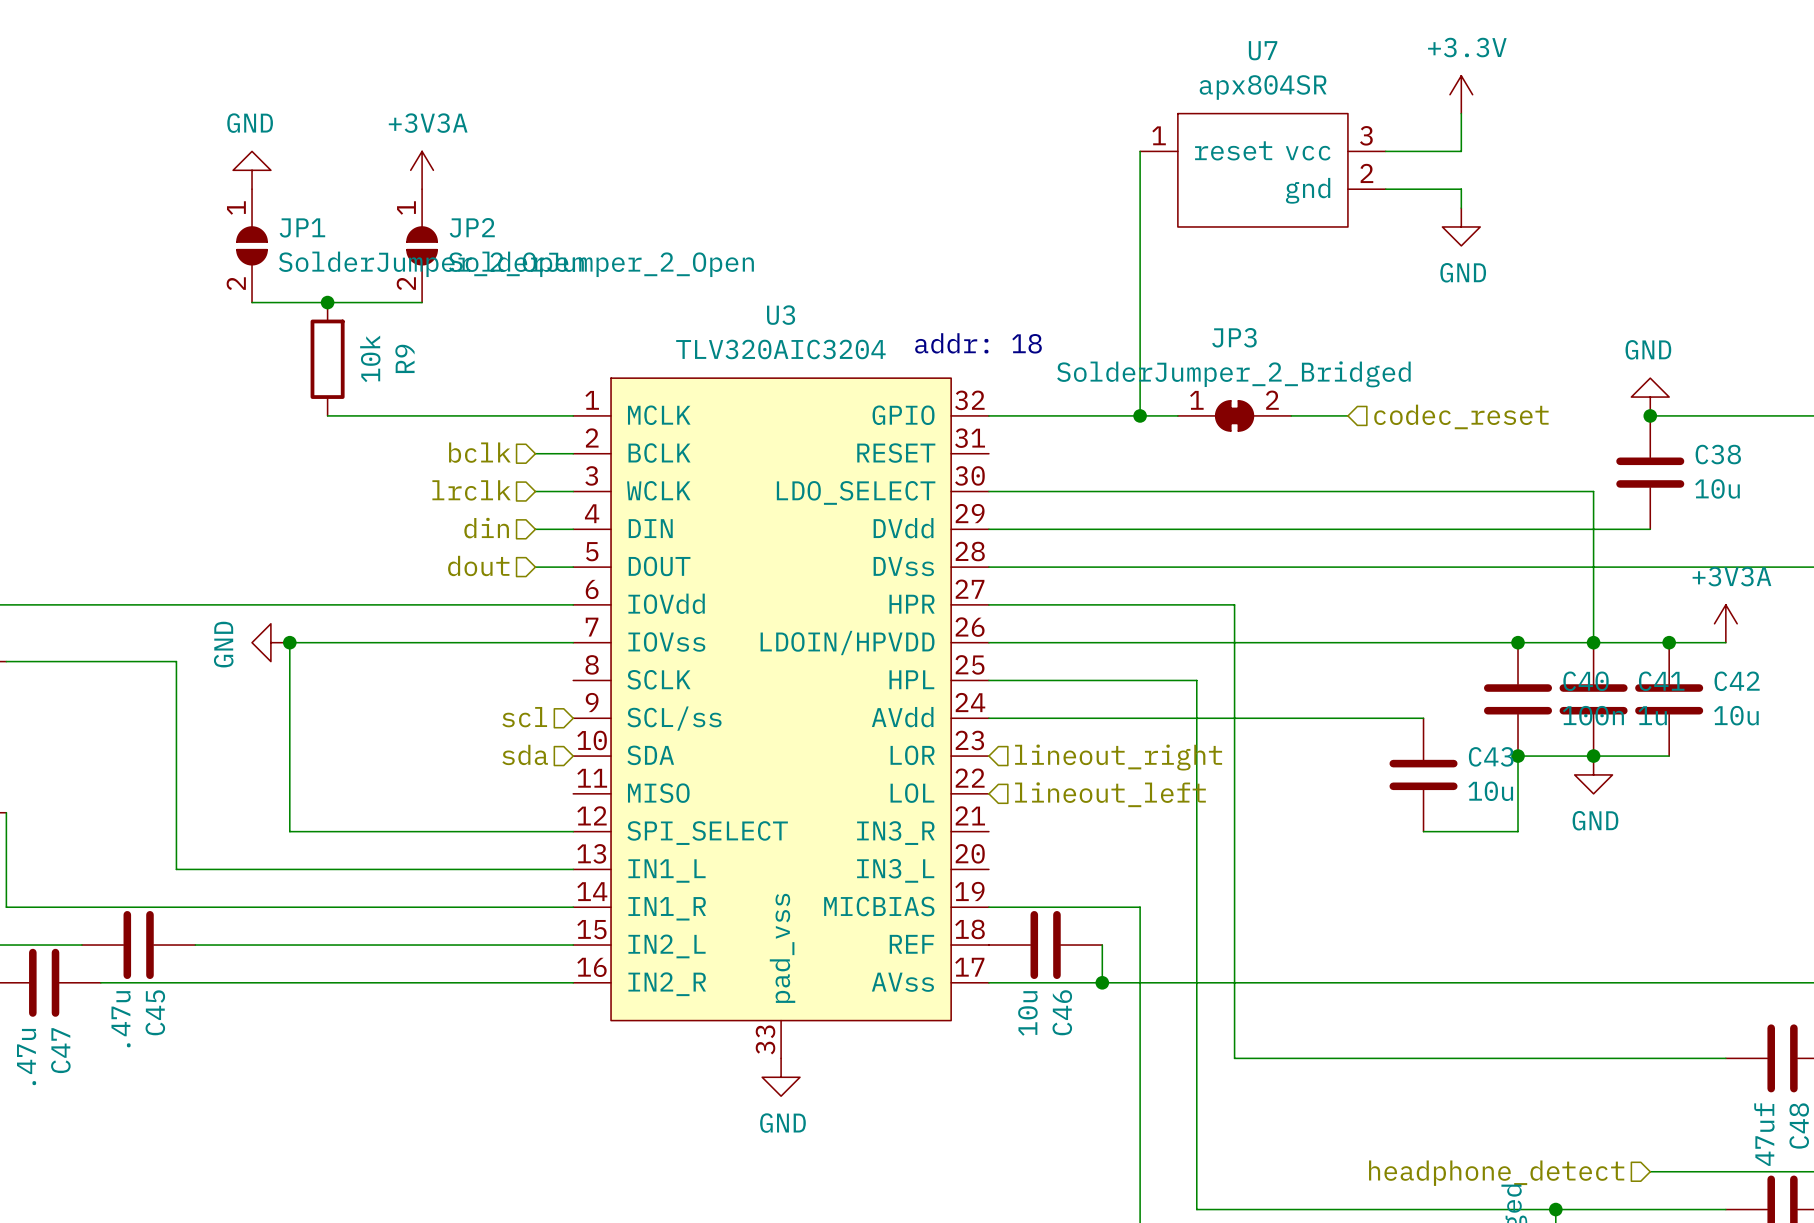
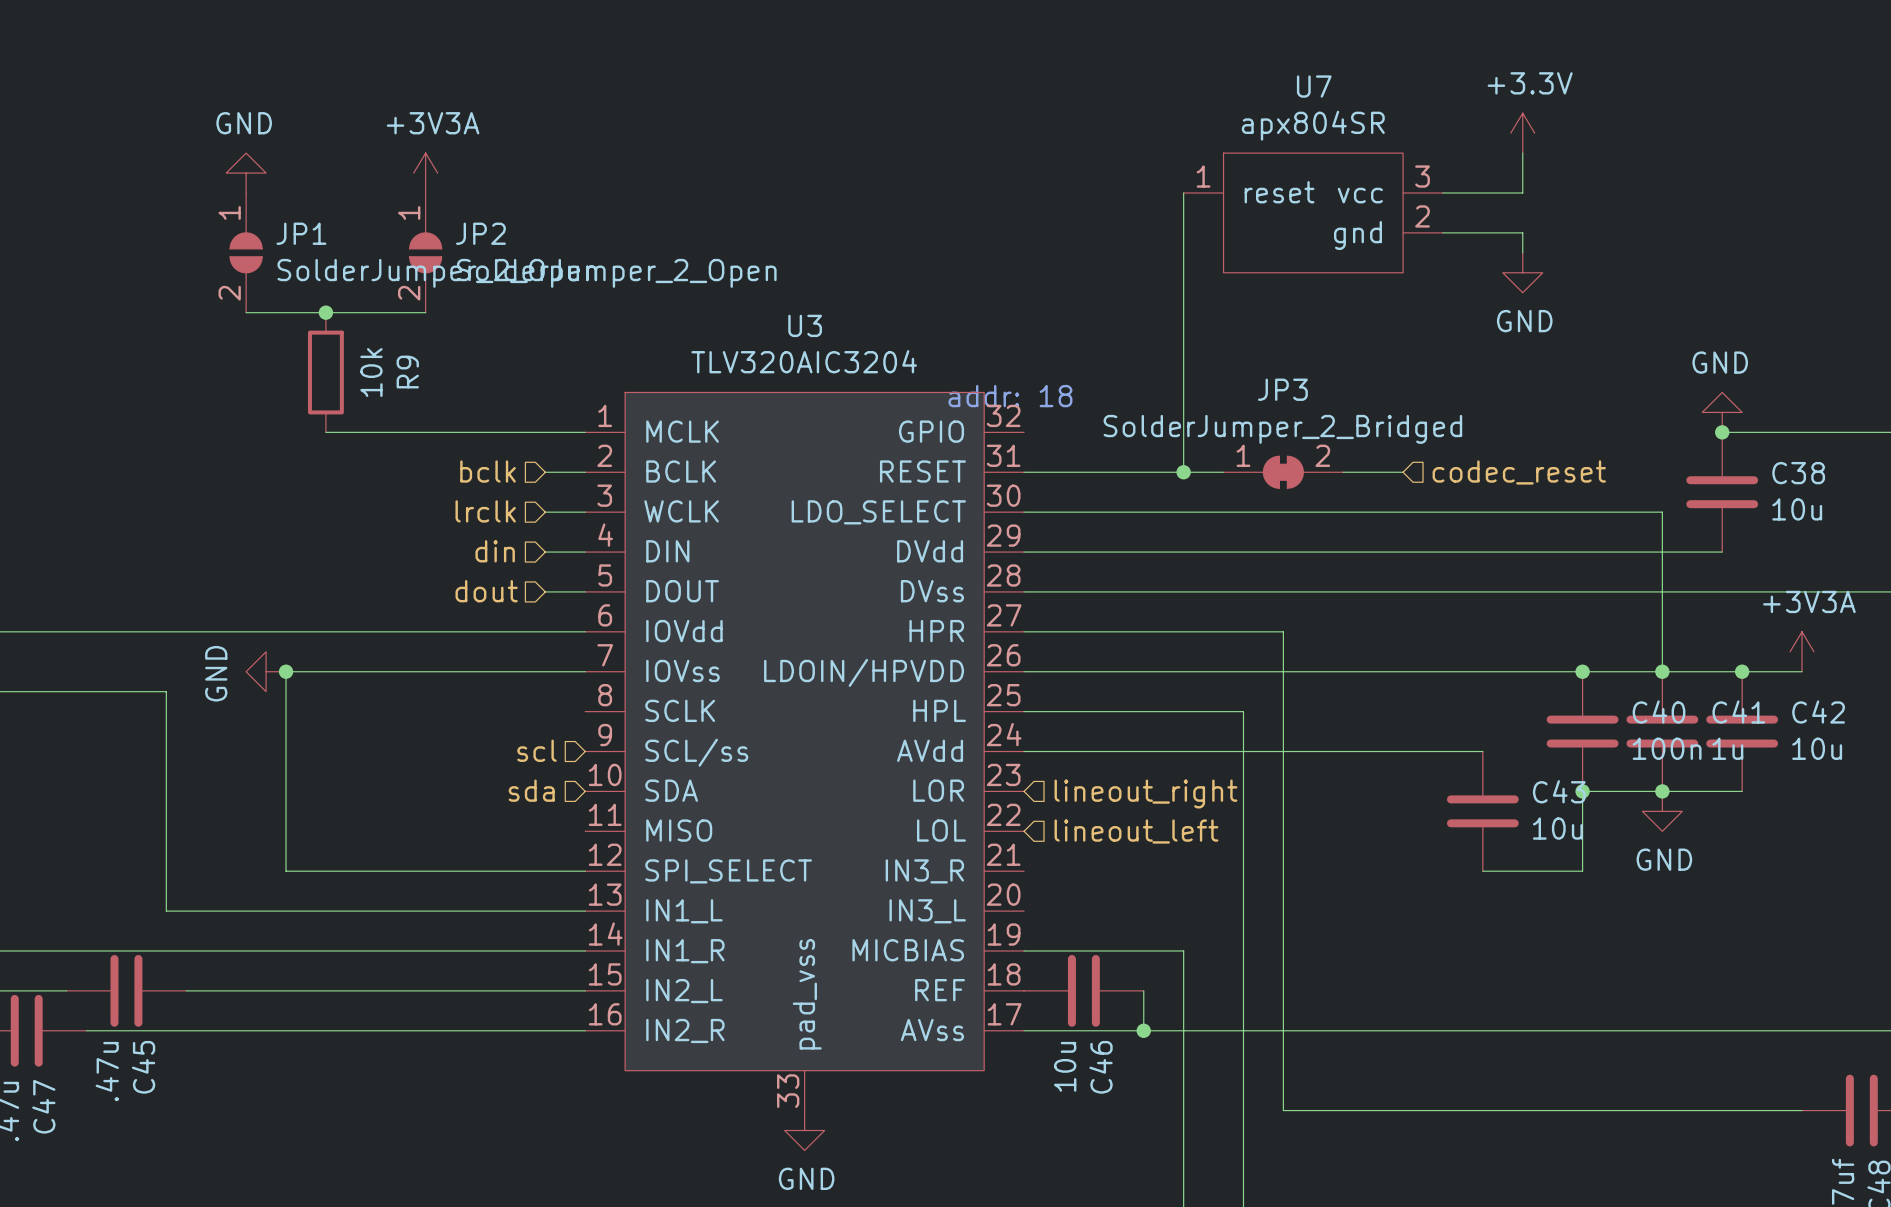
power symbol position: +3.3V (1461, 94) -> +3.3V (1522, 133)
wire: (1461, 113) (1461, 151) (1385, 151) -> none
wire: (1140, 151) (1140, 189) -> (1183, 432) (1183, 472)
U7 position: (1262, 170) -> (1313, 212)
wire: (1461, 189) (1461, 208) -> (1522, 193) (1522, 153)
wire: none -> (1442, 232) (1522, 232) (1522, 252)
power symbol position: GND (1461, 226) -> GND (1522, 272)
text position: addr: 18 (978, 343) -> addr: 18 (1010, 396)
wire: (988, 415) (1177, 415) -> (1024, 472) (1223, 472)
junction position: (1140, 415) -> (1183, 472)
JP3 position: (1234, 415) -> (1283, 472)
wire: (1291, 415) (1347, 415) -> (1343, 472) (1403, 472)
hierarchical label position: codec_reset (1461, 416) -> codec_reset (1519, 472)

